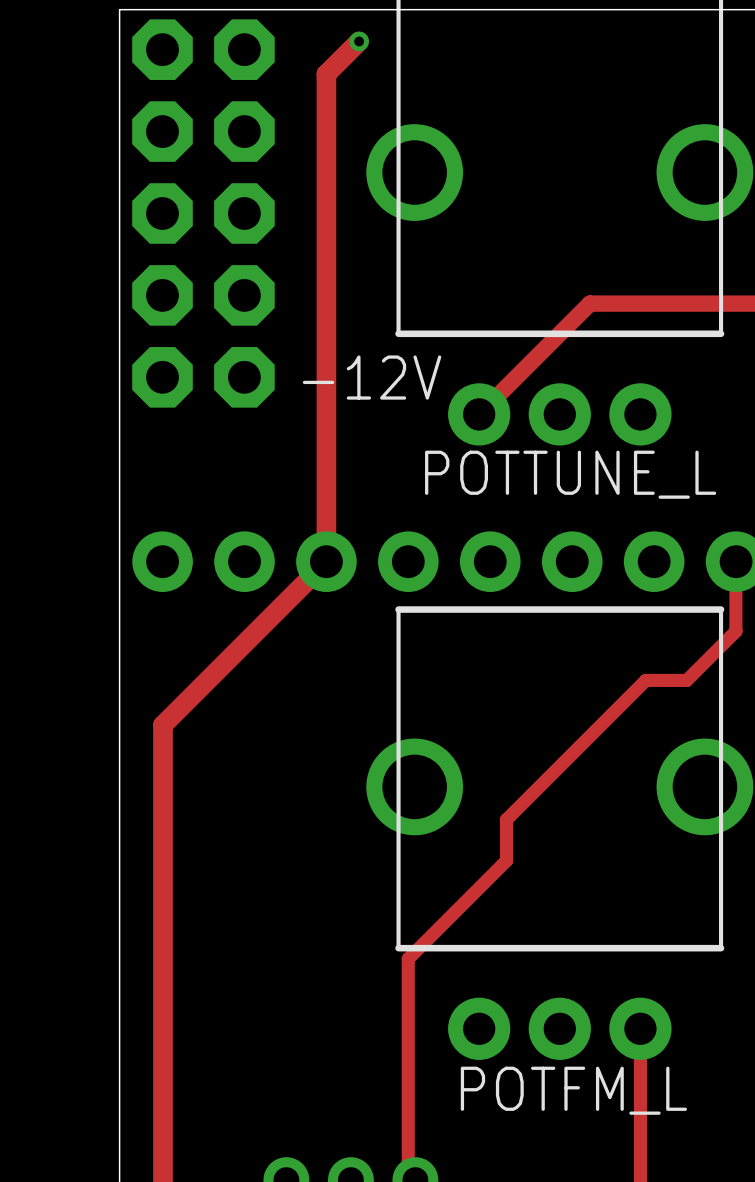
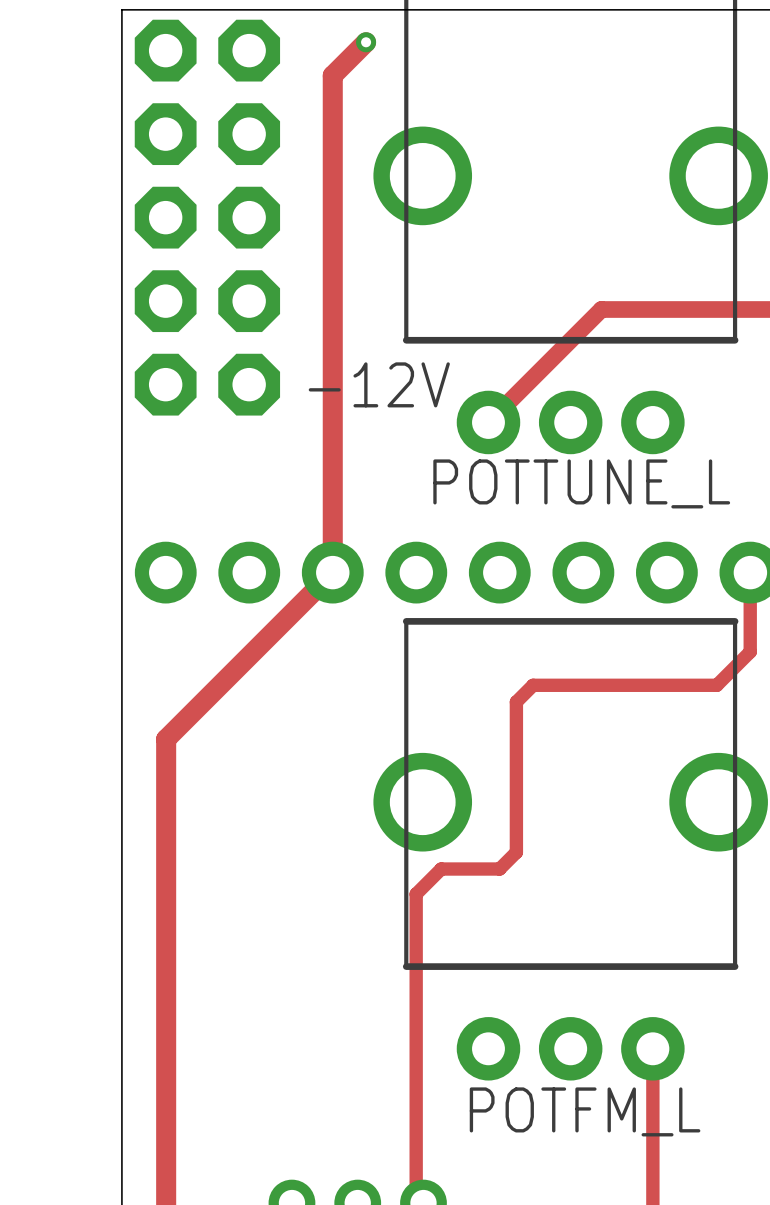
track: (735, 631) (686, 680) (645, 680) (506, 819) -> (750, 643) (750, 651) (716, 685) (533, 685) (516, 702) (516, 835)
track: (506, 836) (506, 860) (408, 958) -> (516, 852) (499, 869) (441, 869) (416, 894) (416, 977)

